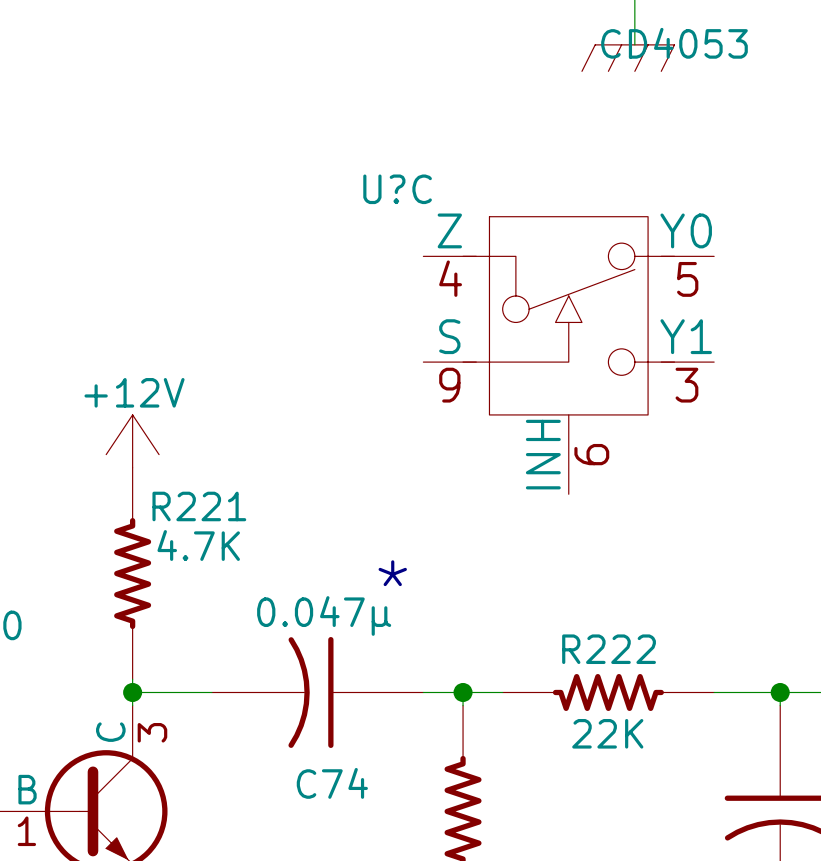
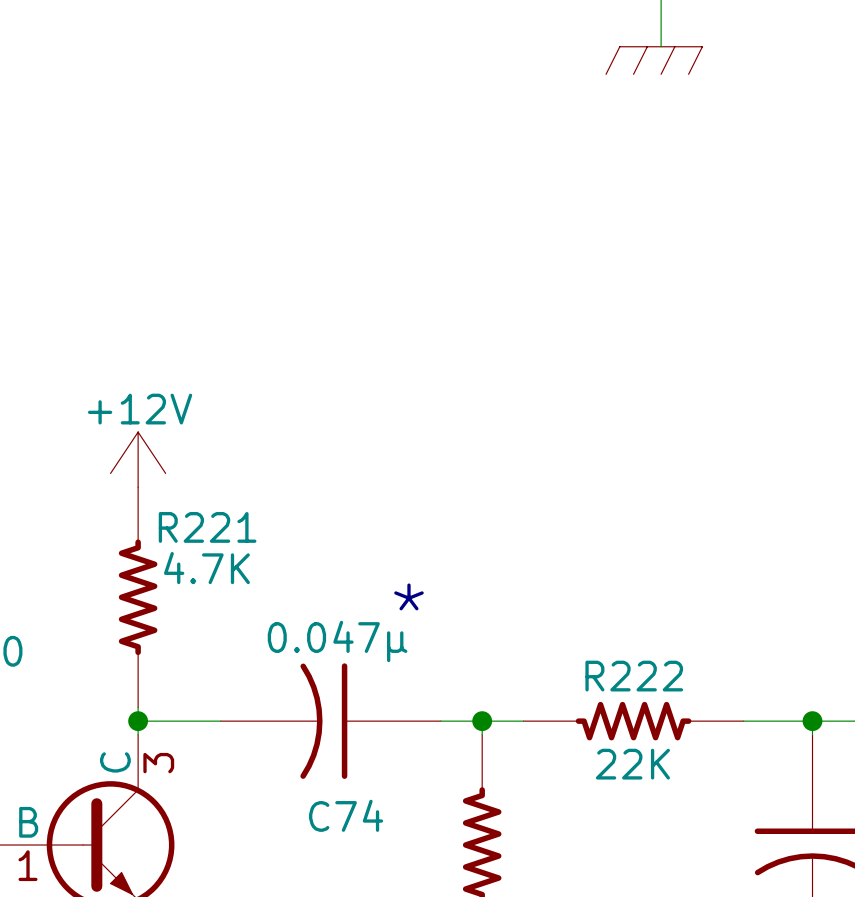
U?C: CD4053 (568, 355) -> none

